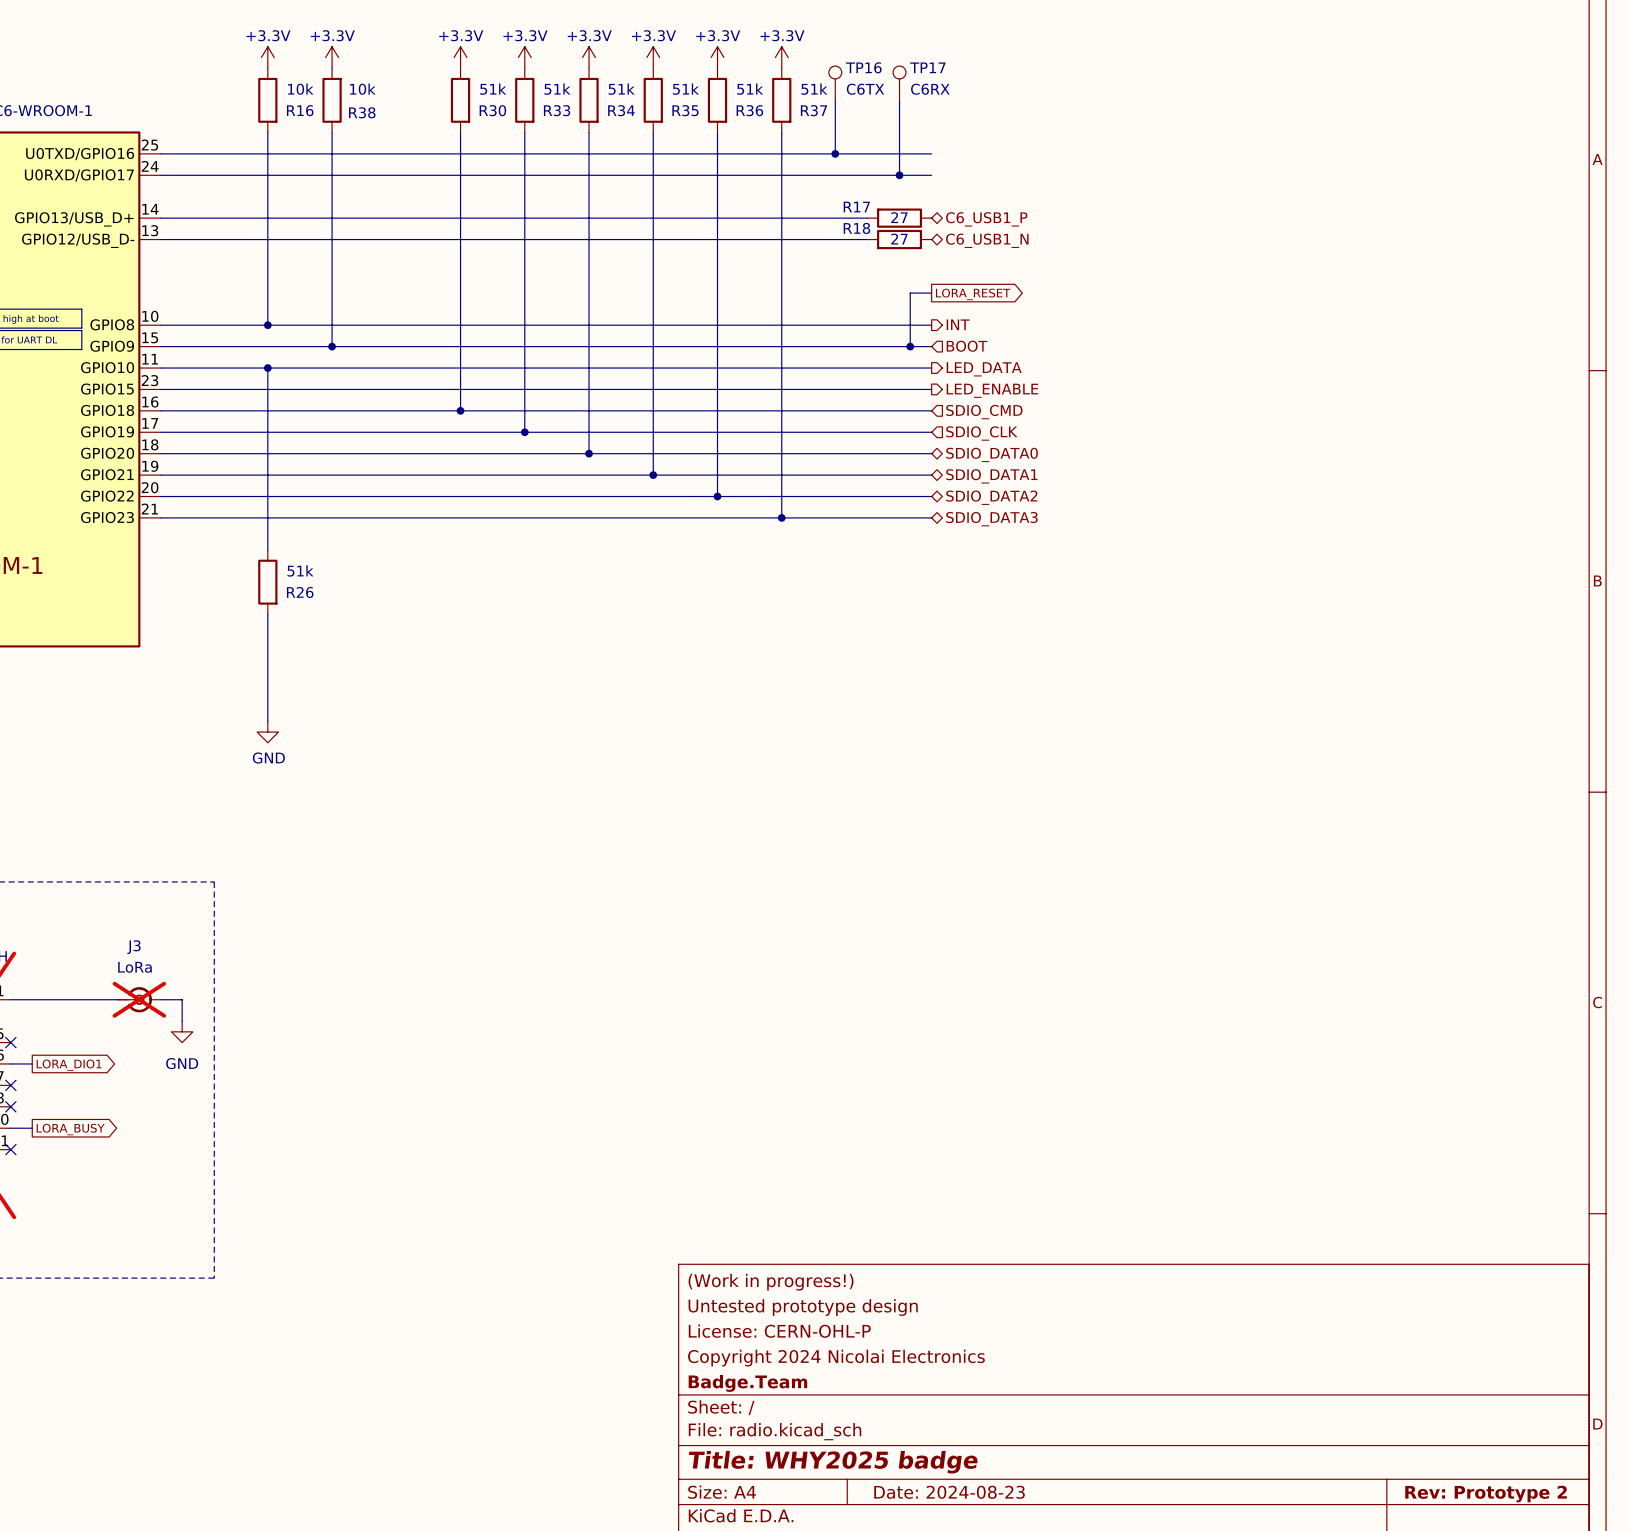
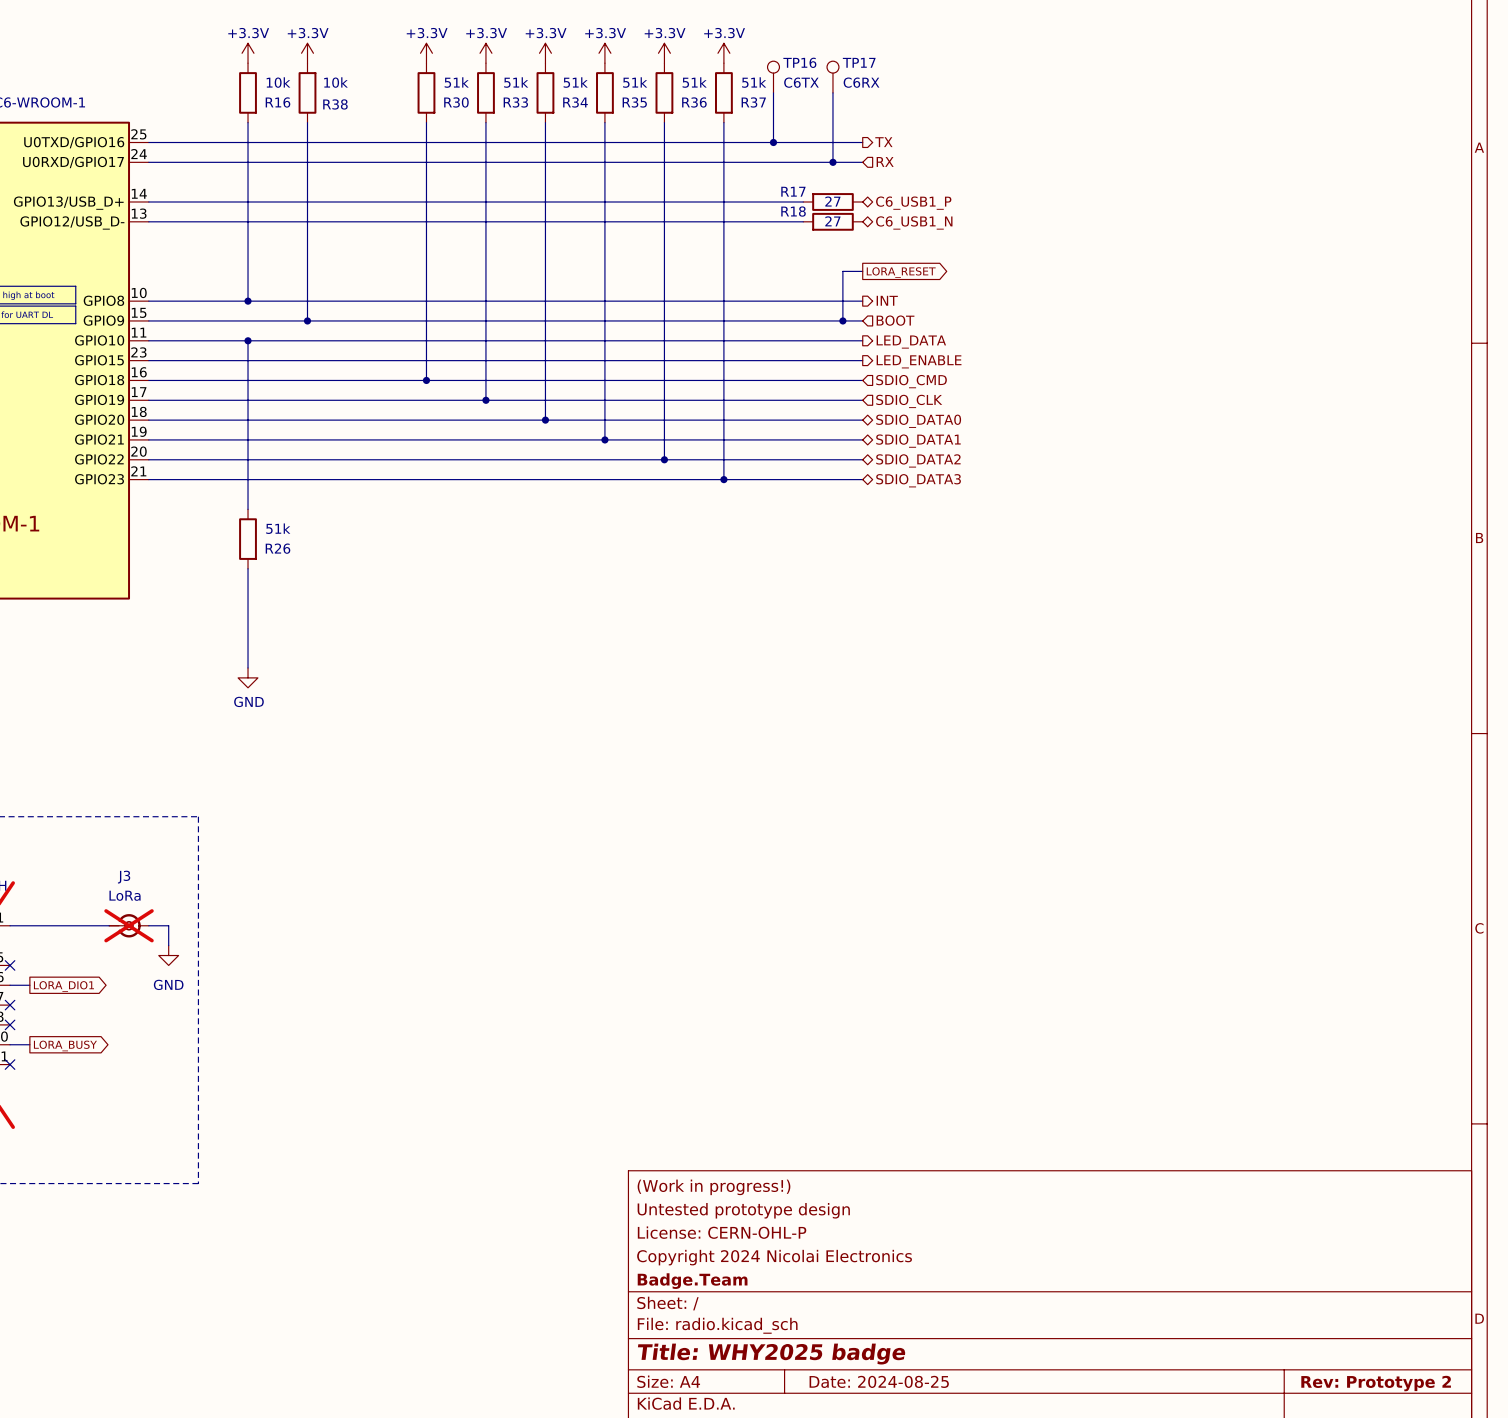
hierarchical label: none -> TX (883, 142)
hierarchical label: none -> RX (885, 161)
title block: Date: 2024-08-23 (949, 1492) -> Date: 2024-08-25 (879, 1381)

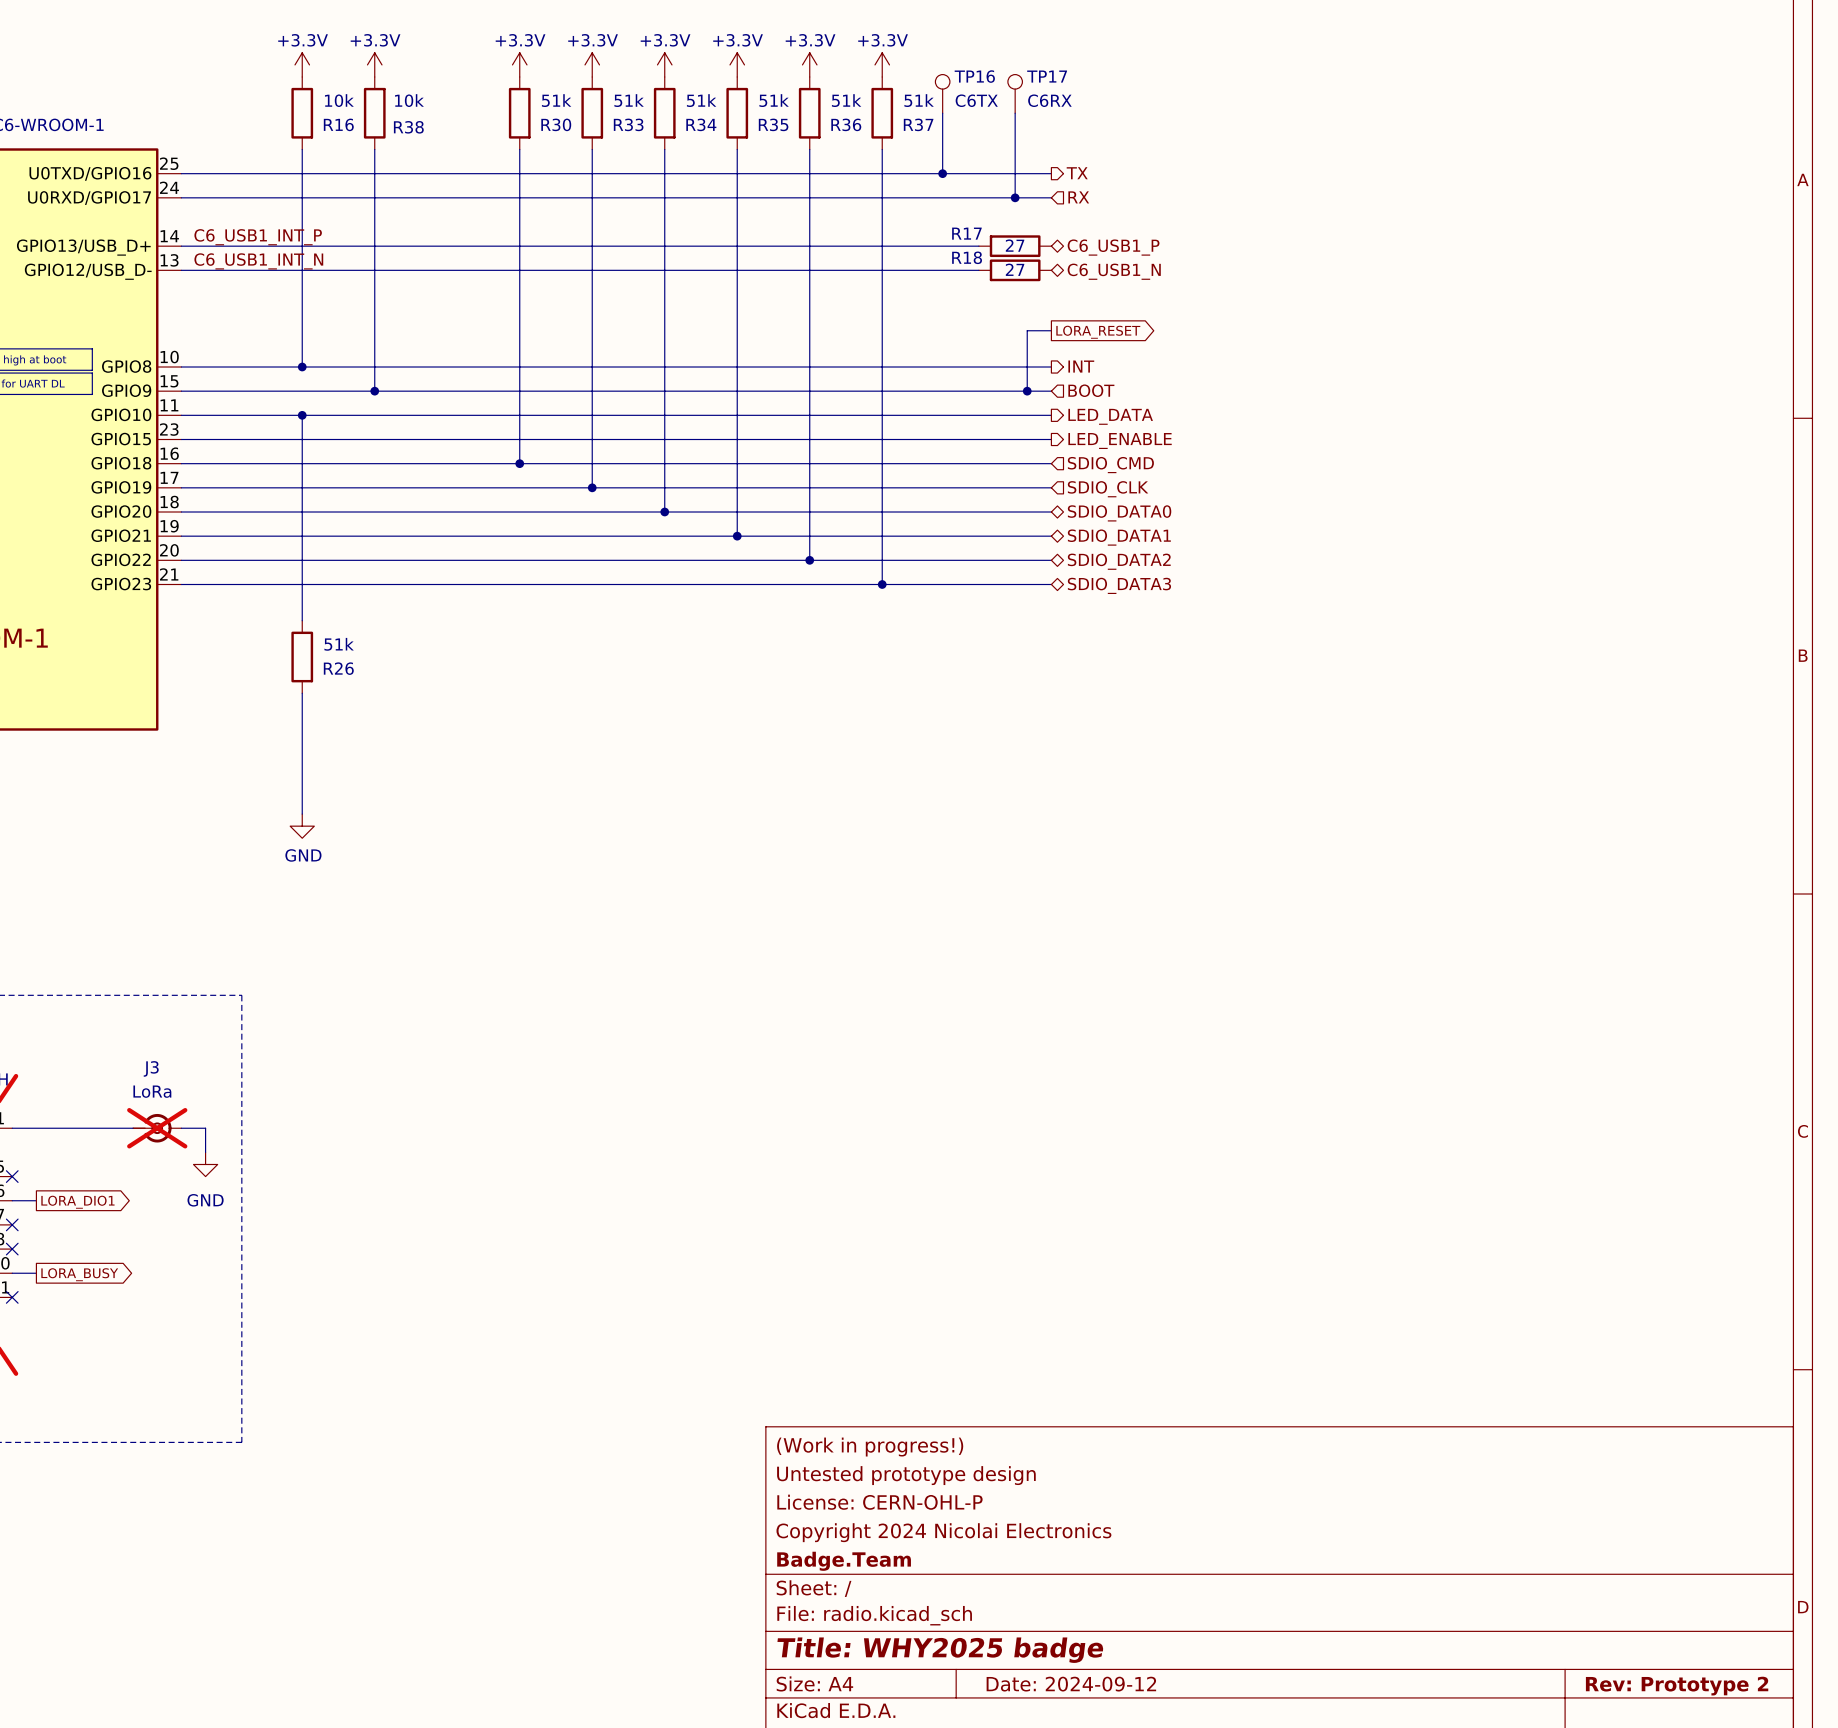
label: none -> C6_USB1_INT_P (258, 237)
label: none -> C6_USB1_INT_N (258, 261)
title block: Date: 2024-08-25 (879, 1381) -> Date: 2024-09-12 (1071, 1684)

